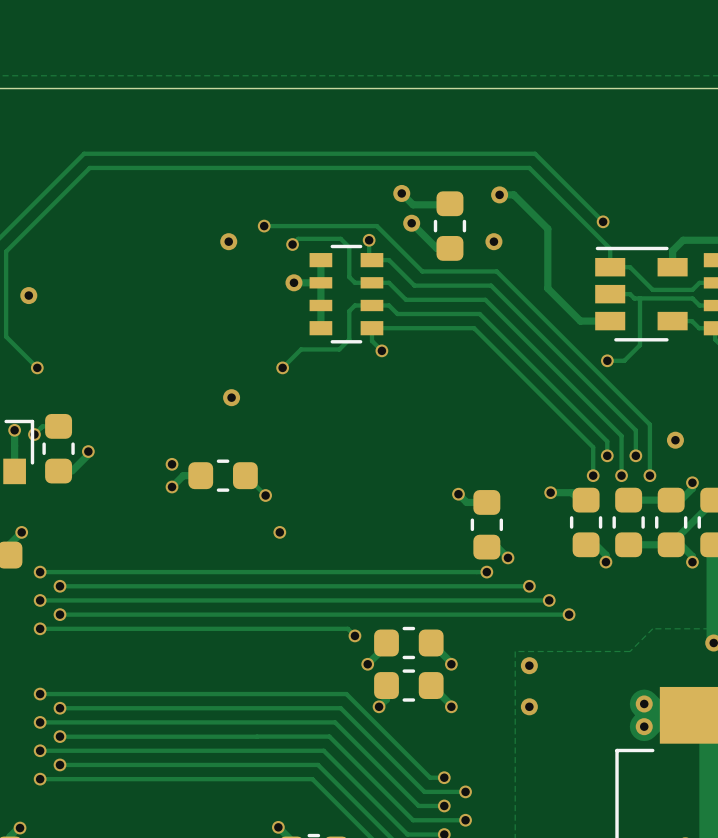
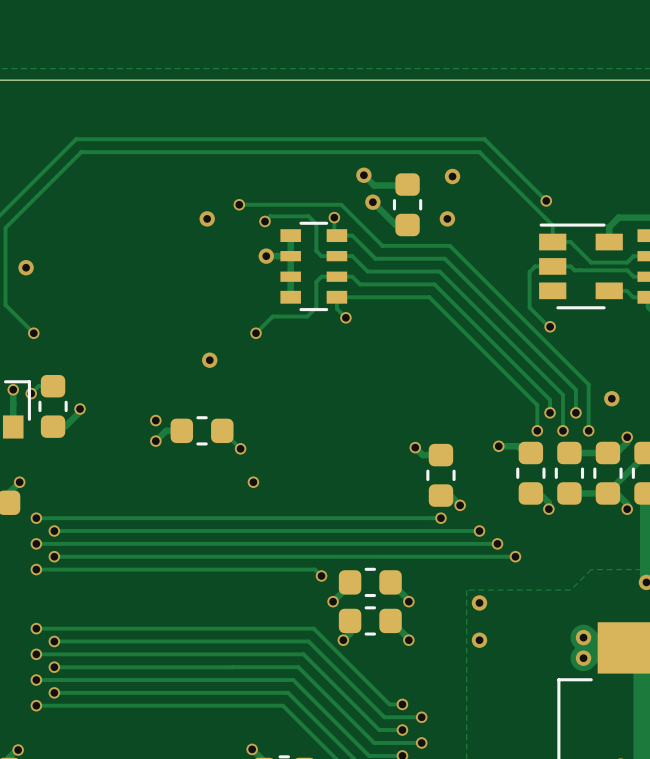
track: (499, 194) (513, 194) (547, 228) (547, 288) (580, 321) (610, 321) -> none
track: none -> (552, 266) (535, 266) (529, 272) (529, 307) (548, 326)
track: (639, 298) (639, 345) (624, 360) (607, 360) -> none

